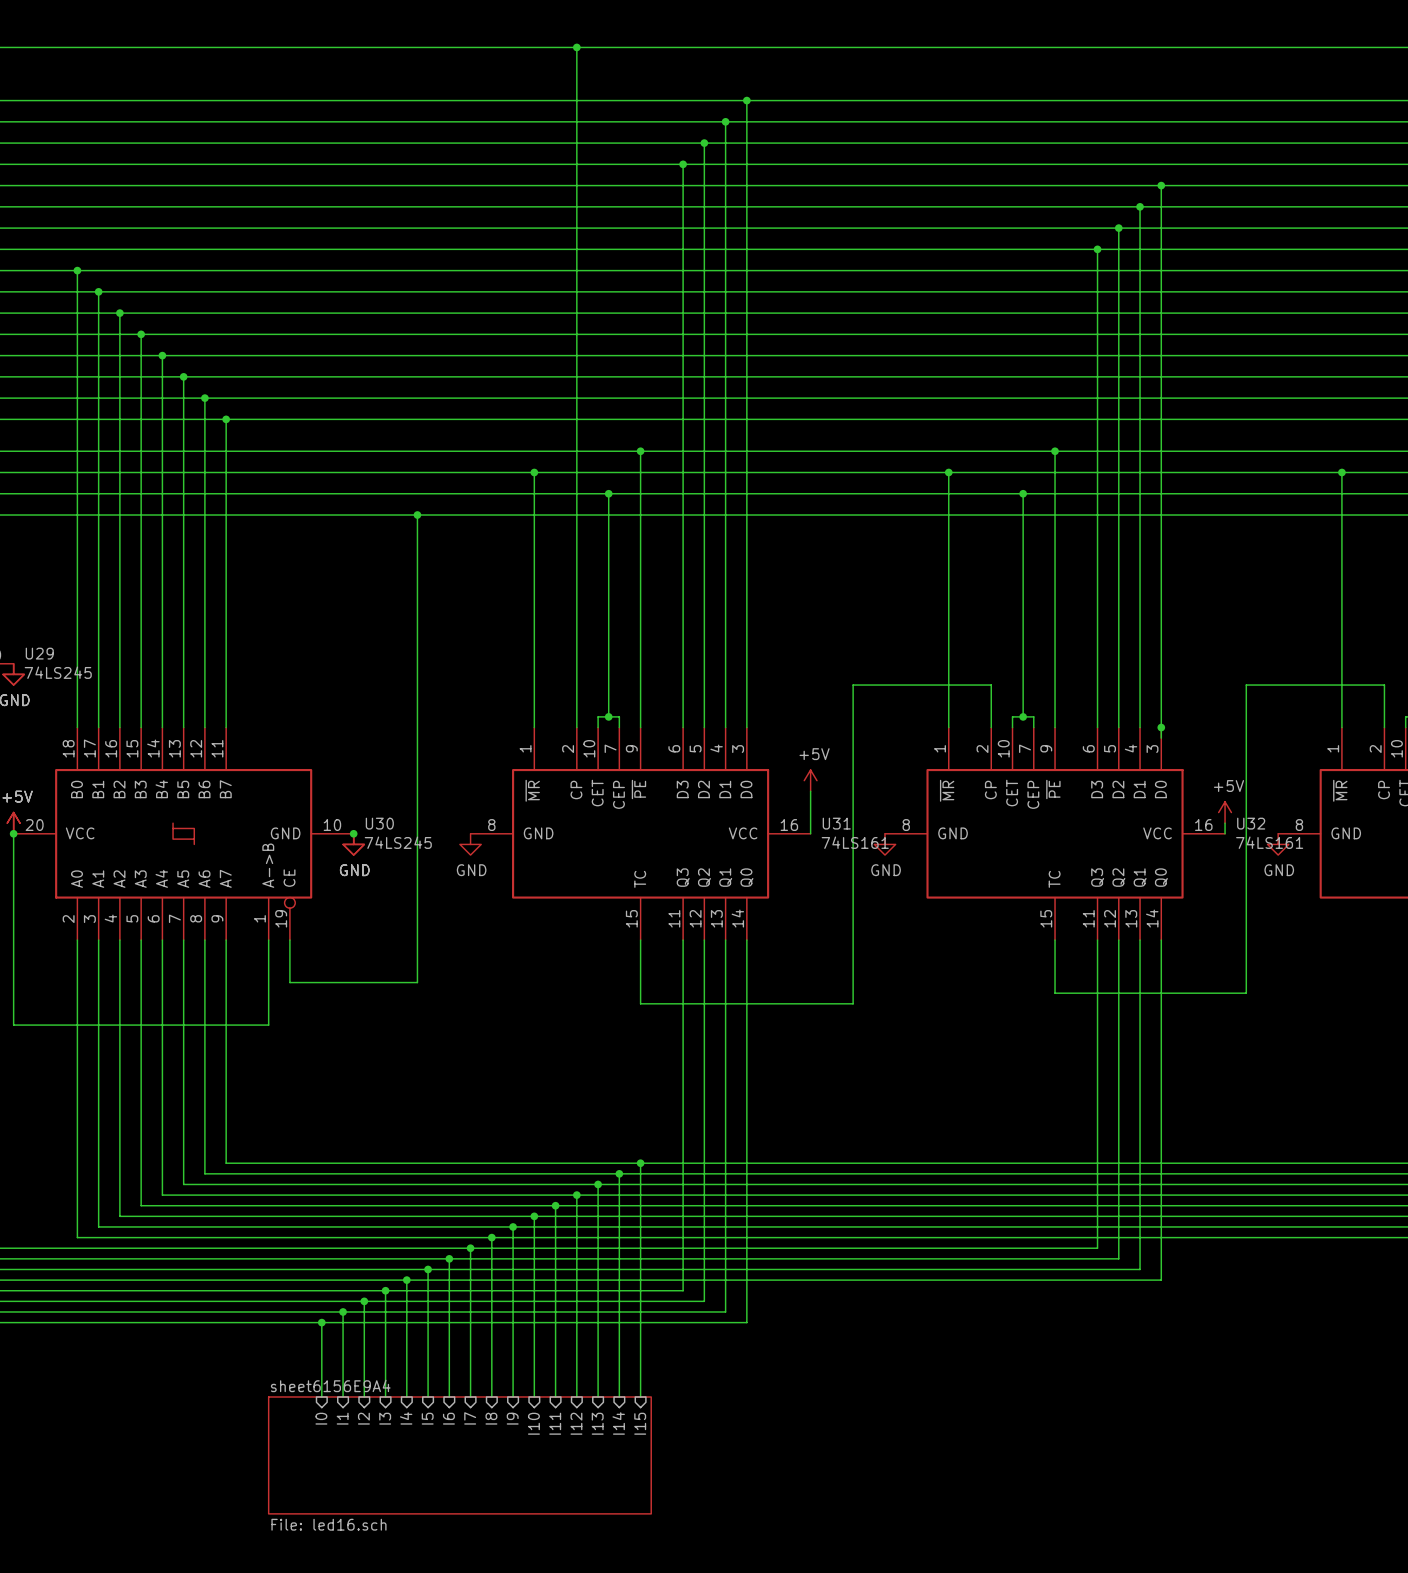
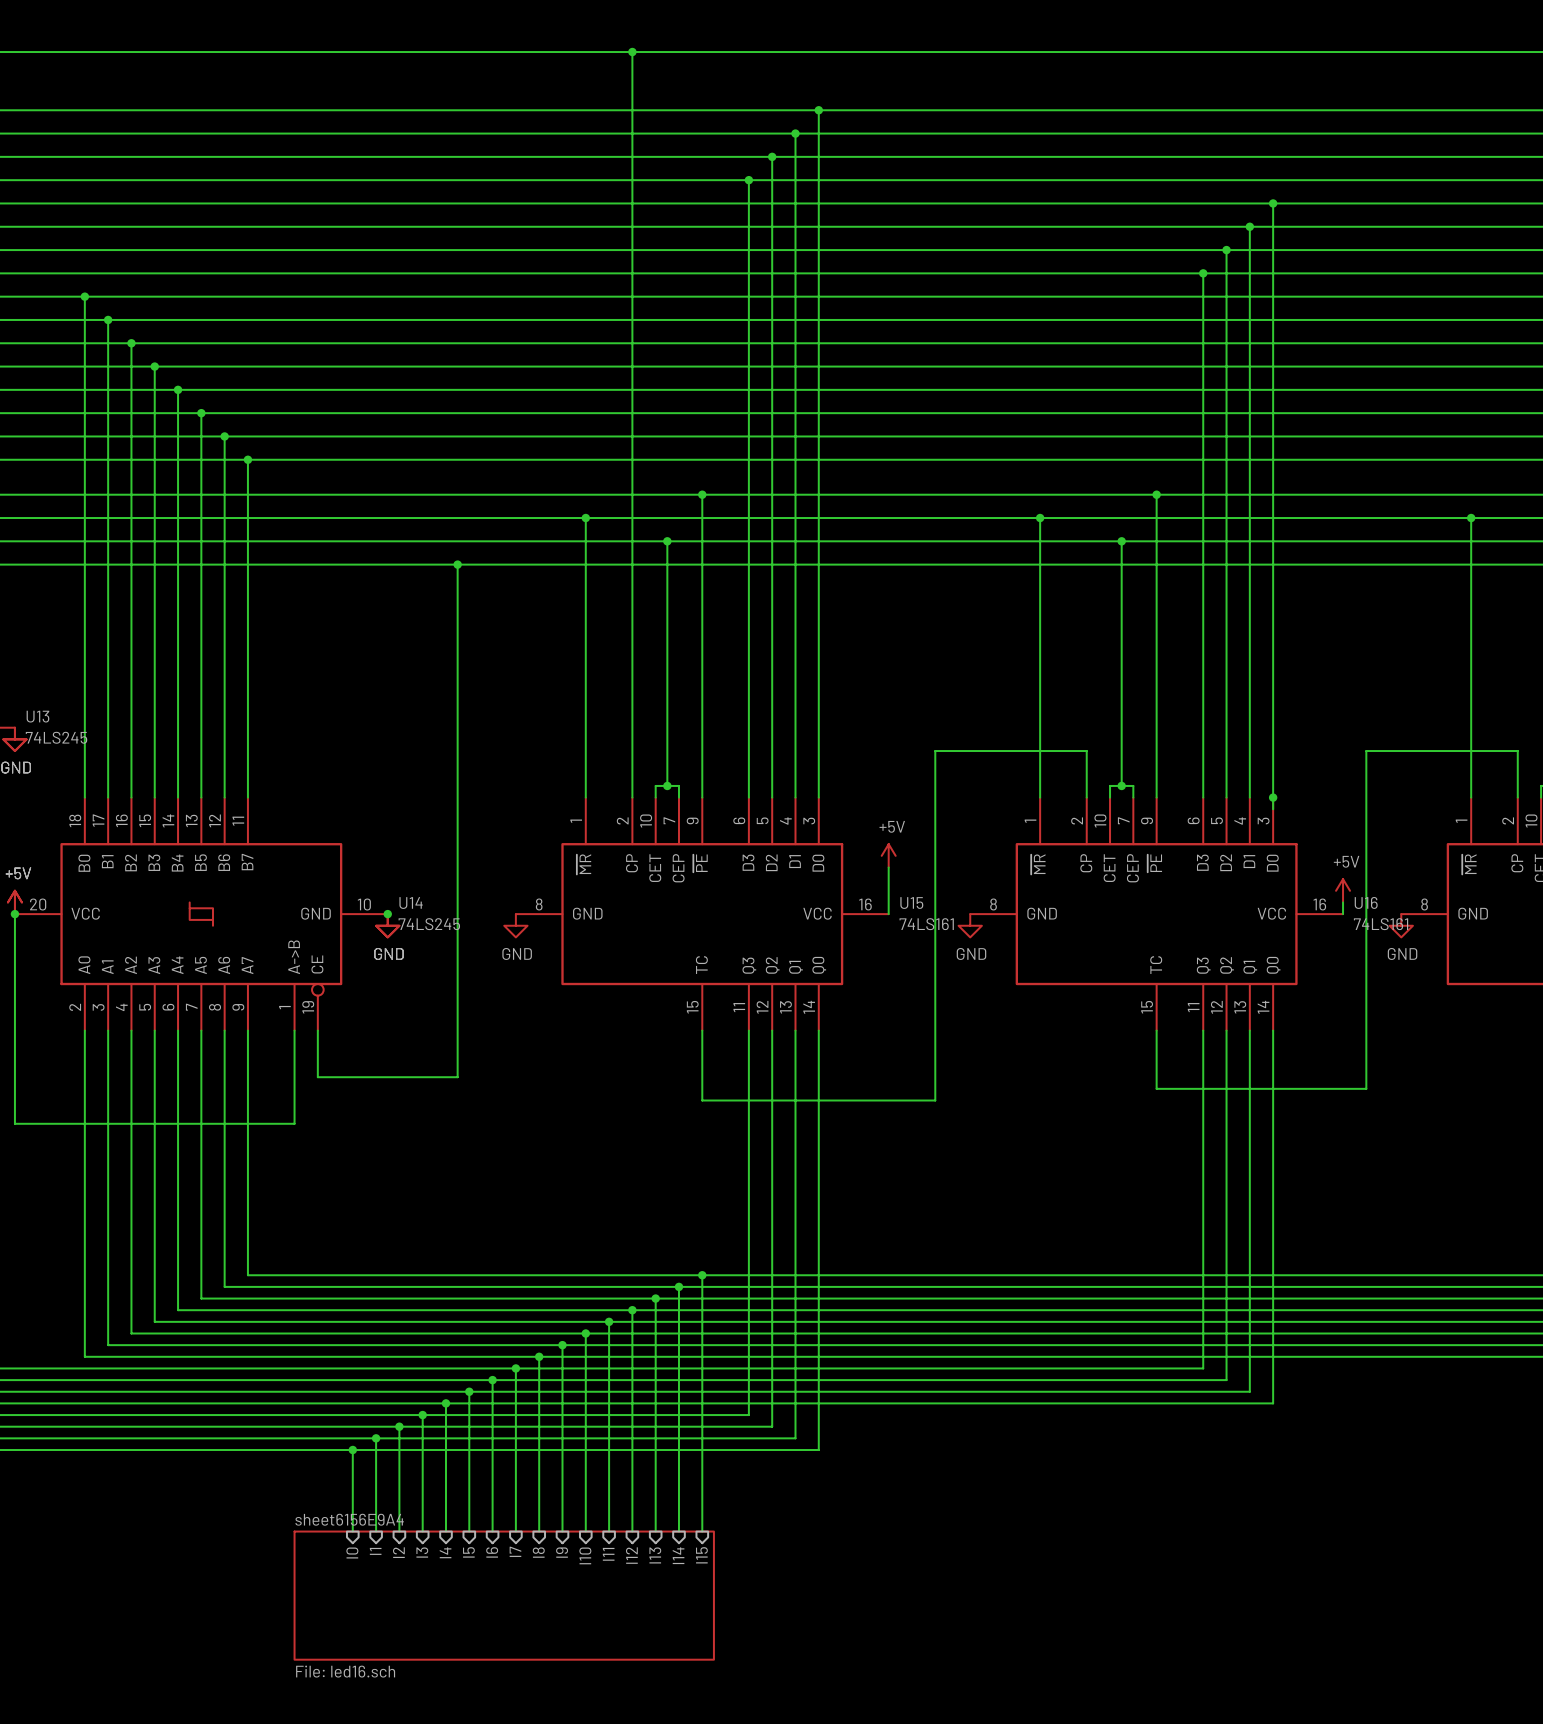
U29 name: U29 (39, 653) -> U13 (37, 716)
U30 name: U30 (379, 823) -> U14 (411, 903)
U31 name: U31 (836, 823) -> U15 (911, 903)
U32 name: U32 (1251, 823) -> U16 (1366, 902)

